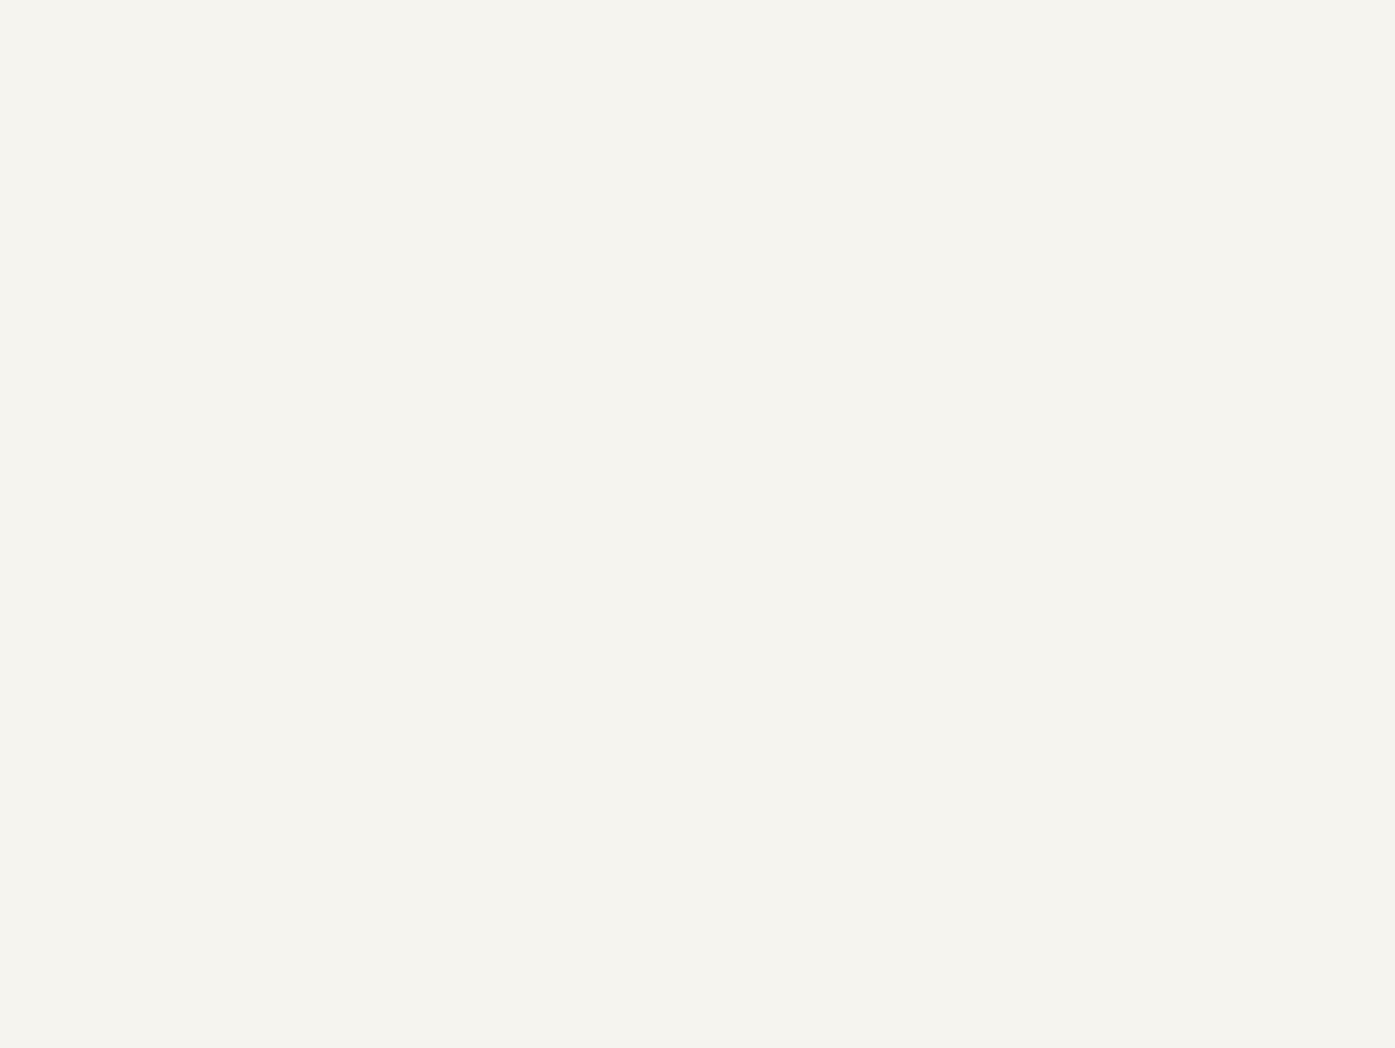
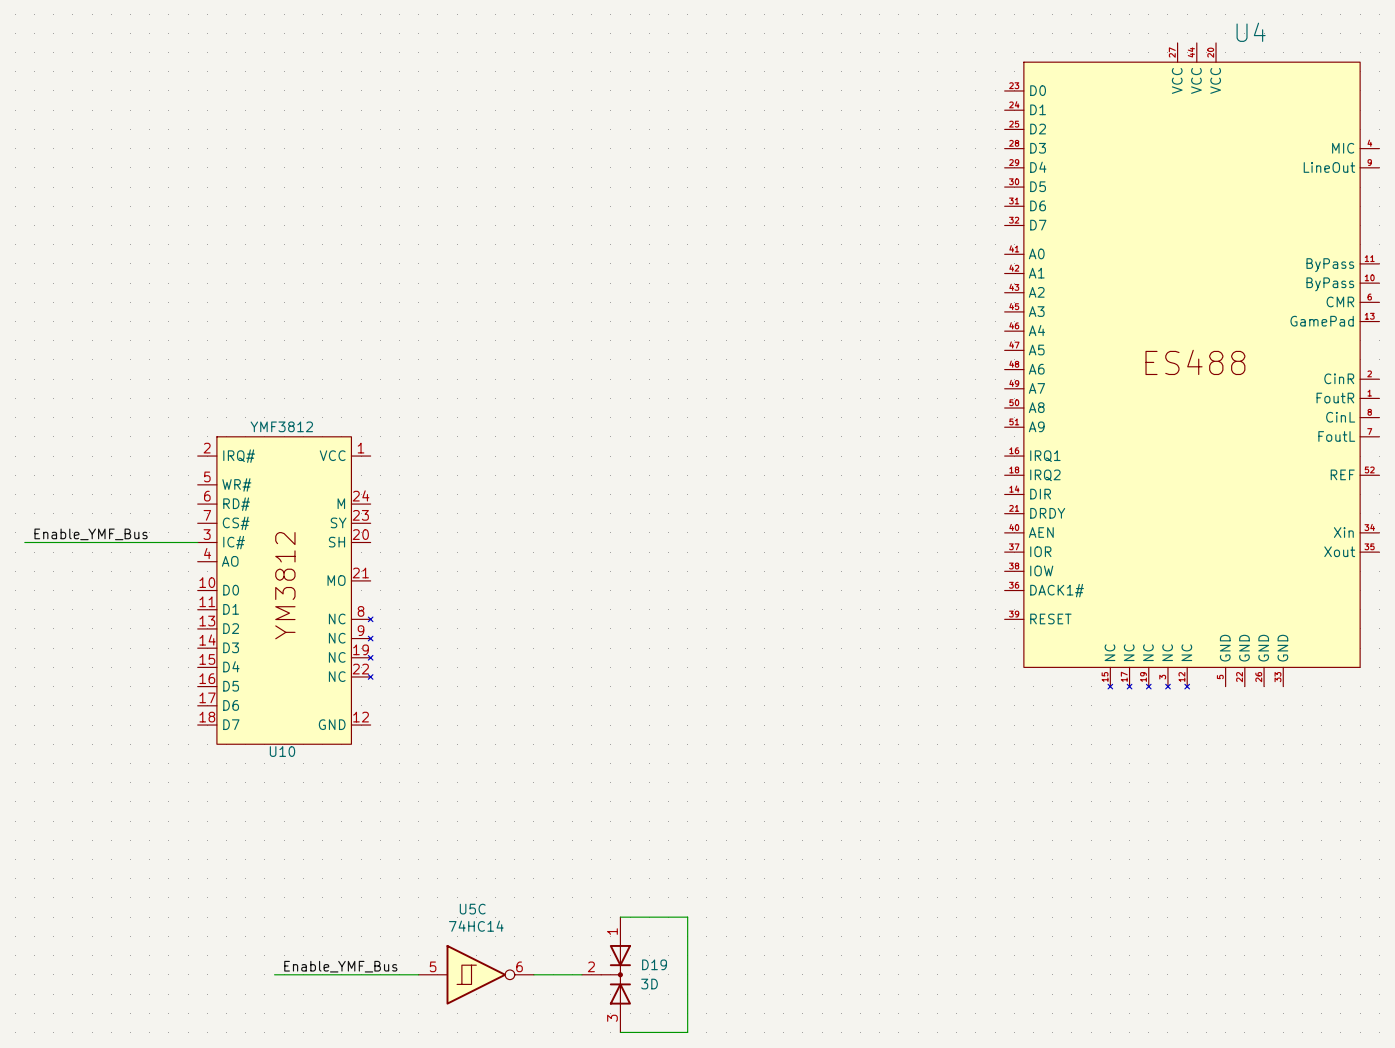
U4: none -> (1192, 365)
label: none -> Enable_YMF_Bus (91, 534)
wire: none -> (24, 542) (197, 542)
U10: none -> YMF3812 (285, 590)
wire: none -> (620, 917) (687, 917) (687, 1032) (620, 1032)
label: none -> Enable_YMF_Bus (340, 966)
wire: none -> (274, 974) (418, 974)
U5C: none -> 74HC14 (476, 974)
wire: none -> (533, 974) (581, 974)
D19: none -> 3D (606, 974)

